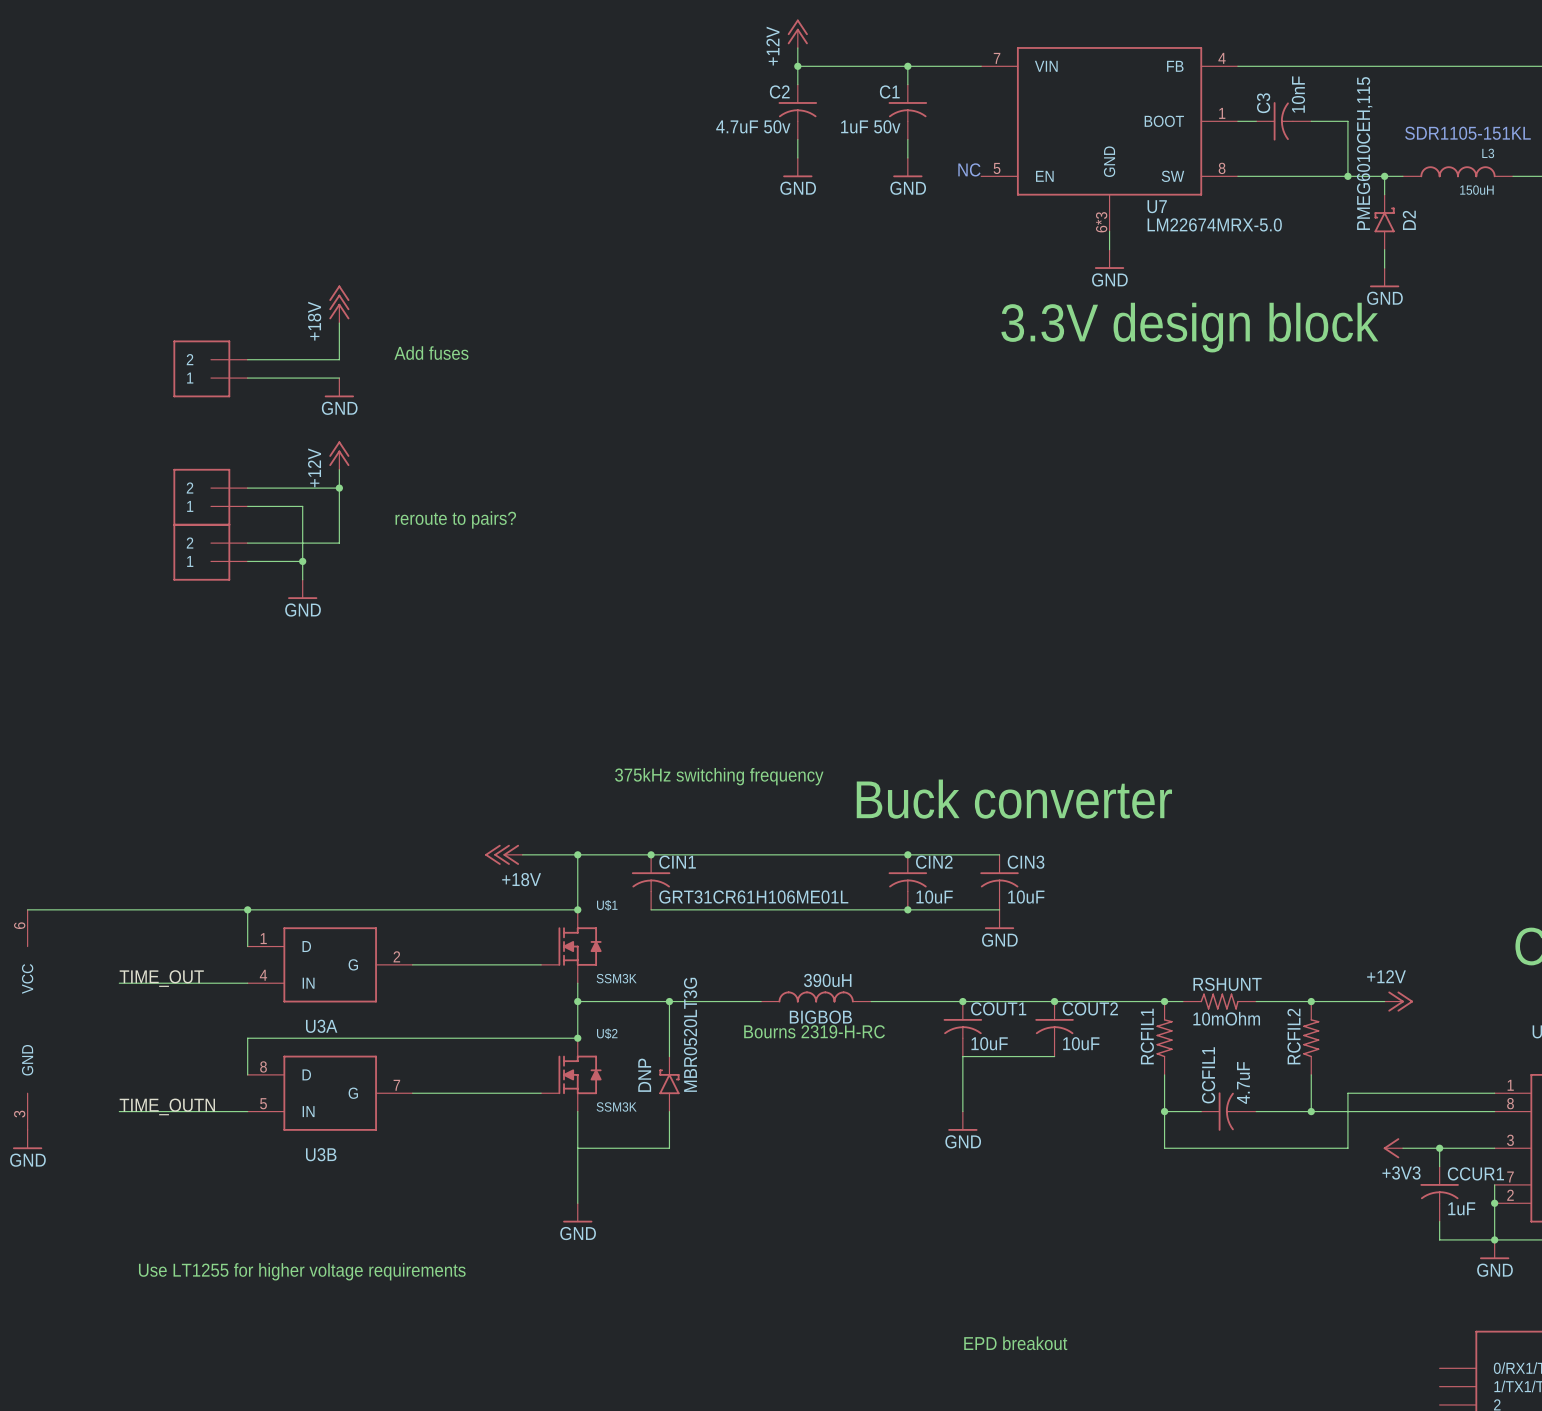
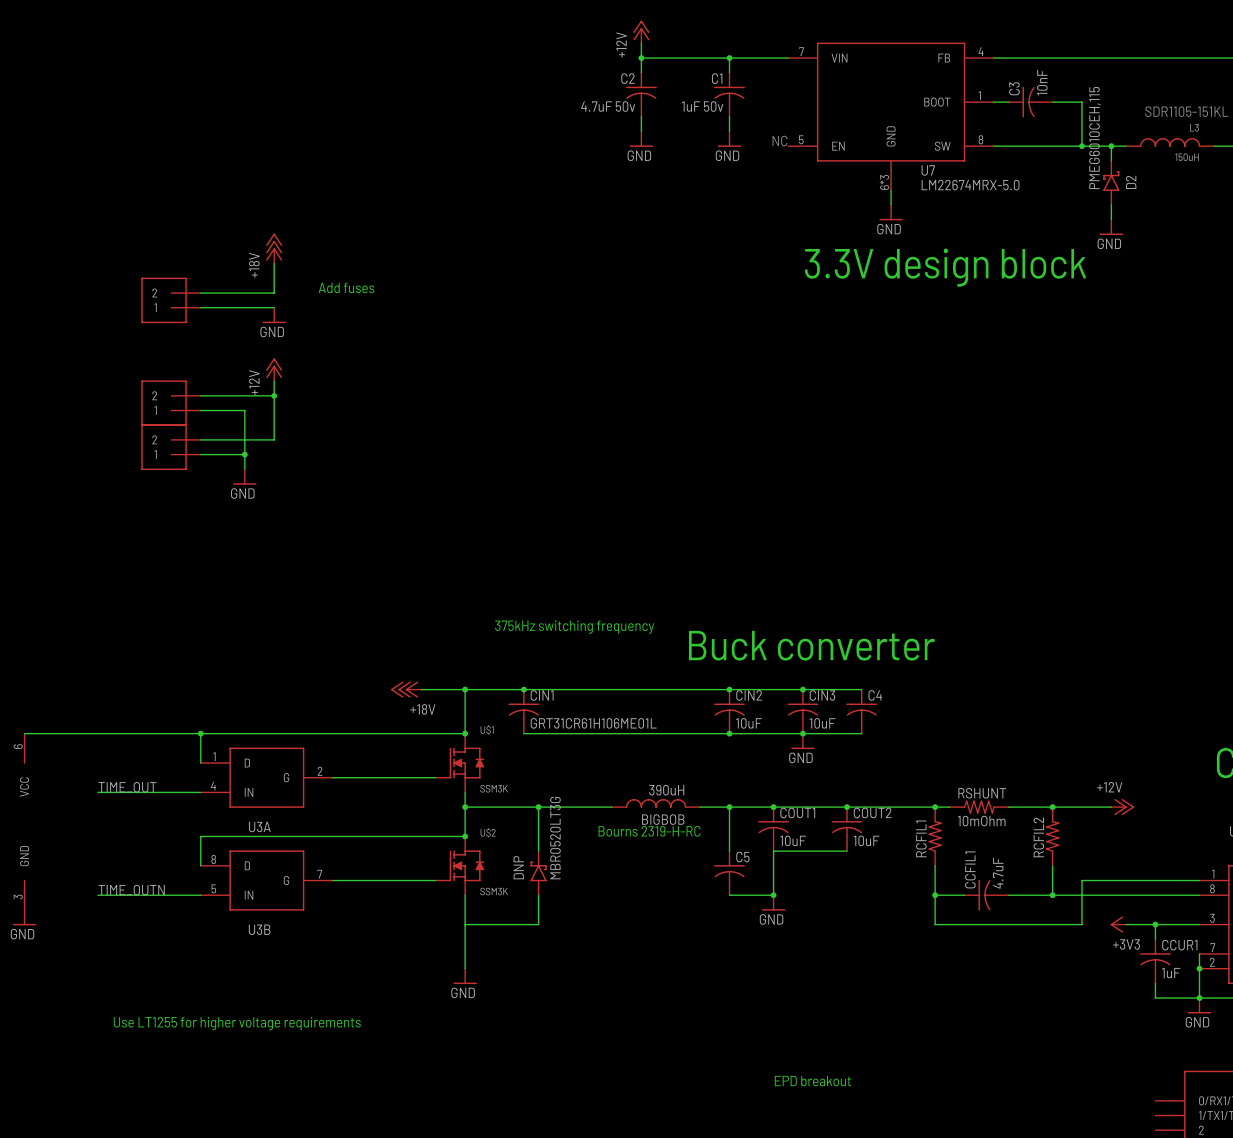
text: reroute to pairs? (455, 519) -> none
wire: none -> (802, 689) (861, 689)
junction: none -> (802, 689)
C4: none -> (861, 711)
wire: none -> (802, 733) (861, 733)
junction: none -> (802, 733)
wire: none -> (729, 807) (729, 851)
junction: none -> (729, 807)
C5: none -> (729, 873)
wire: none -> (729, 895) (773, 895)
junction: none -> (773, 895)

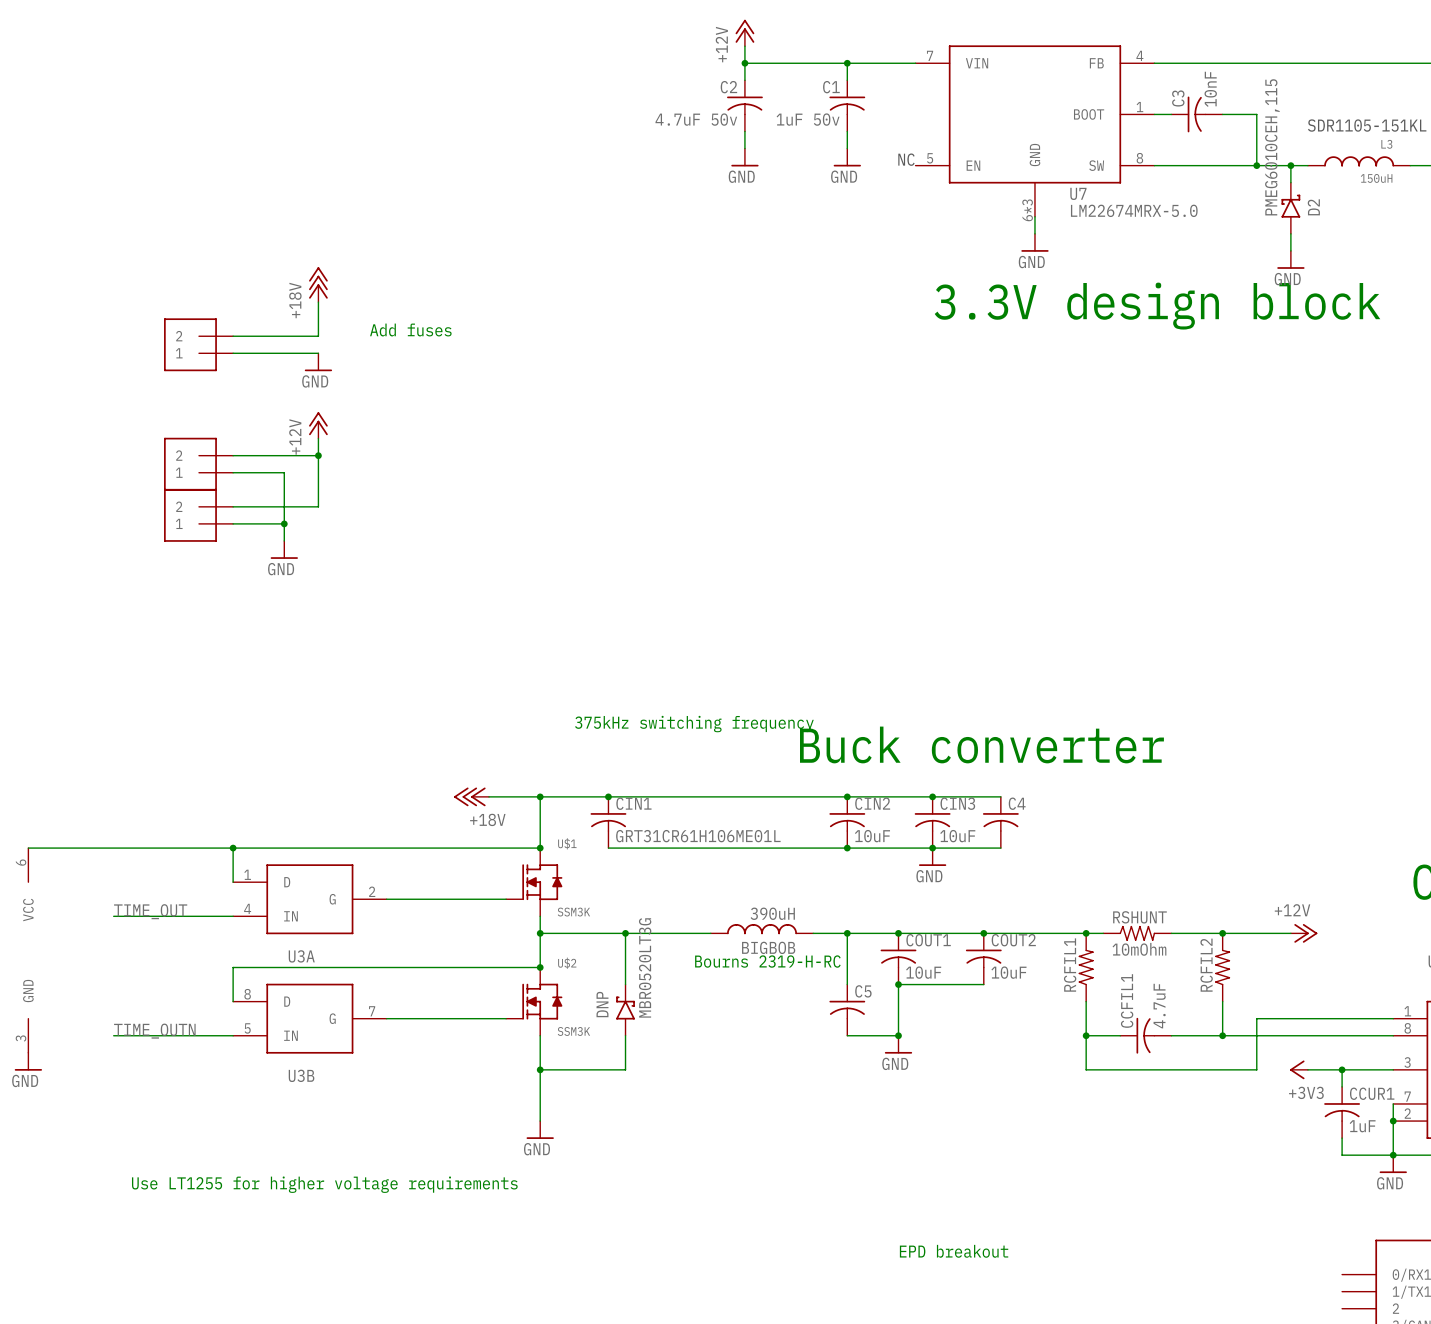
junction: none -> (898, 984)
junction: none -> (540, 1069)

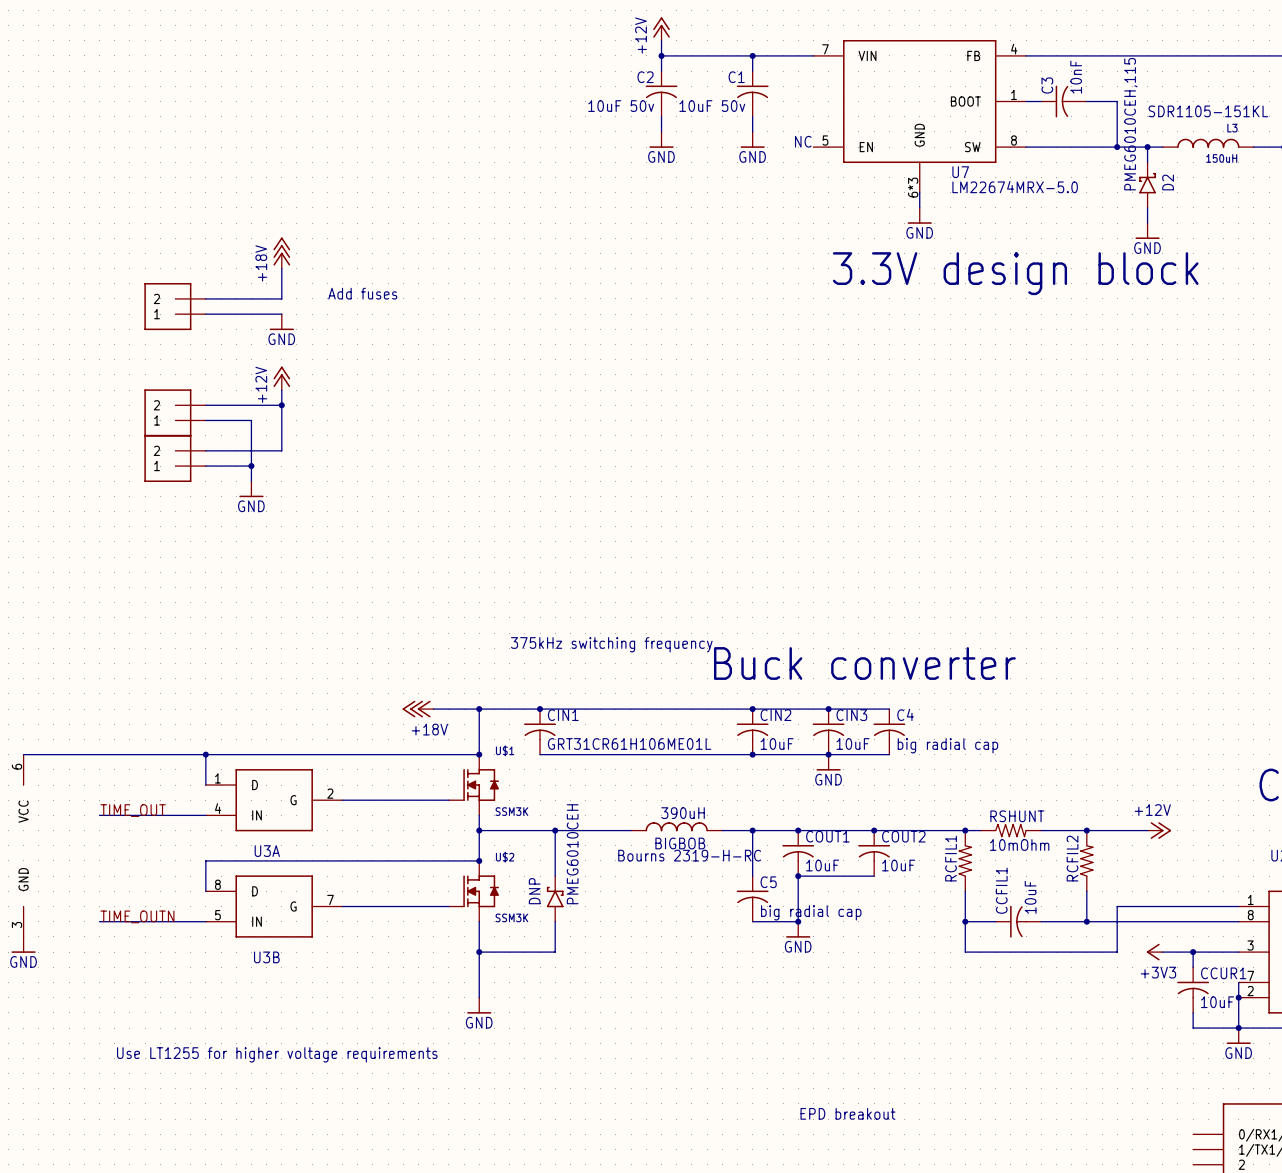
C2 value: 4.7uF 50v (696, 119) -> 10uF 50v (621, 106)
C1 value: 1uF 50v (808, 119) -> 10uF 50v (712, 106)
C4 value: none -> big radial cap (947, 745)
DNP value: MBR0520LT3G (645, 967) -> PMEG6010CEH (572, 854)
CCFIL1 value: 4.7uF (1159, 1006) -> 10uF (1030, 897)
C5 value: none -> big radial cap (811, 912)
CCUR1 value: 1uF (1362, 1126) -> 10uF (1217, 1002)

